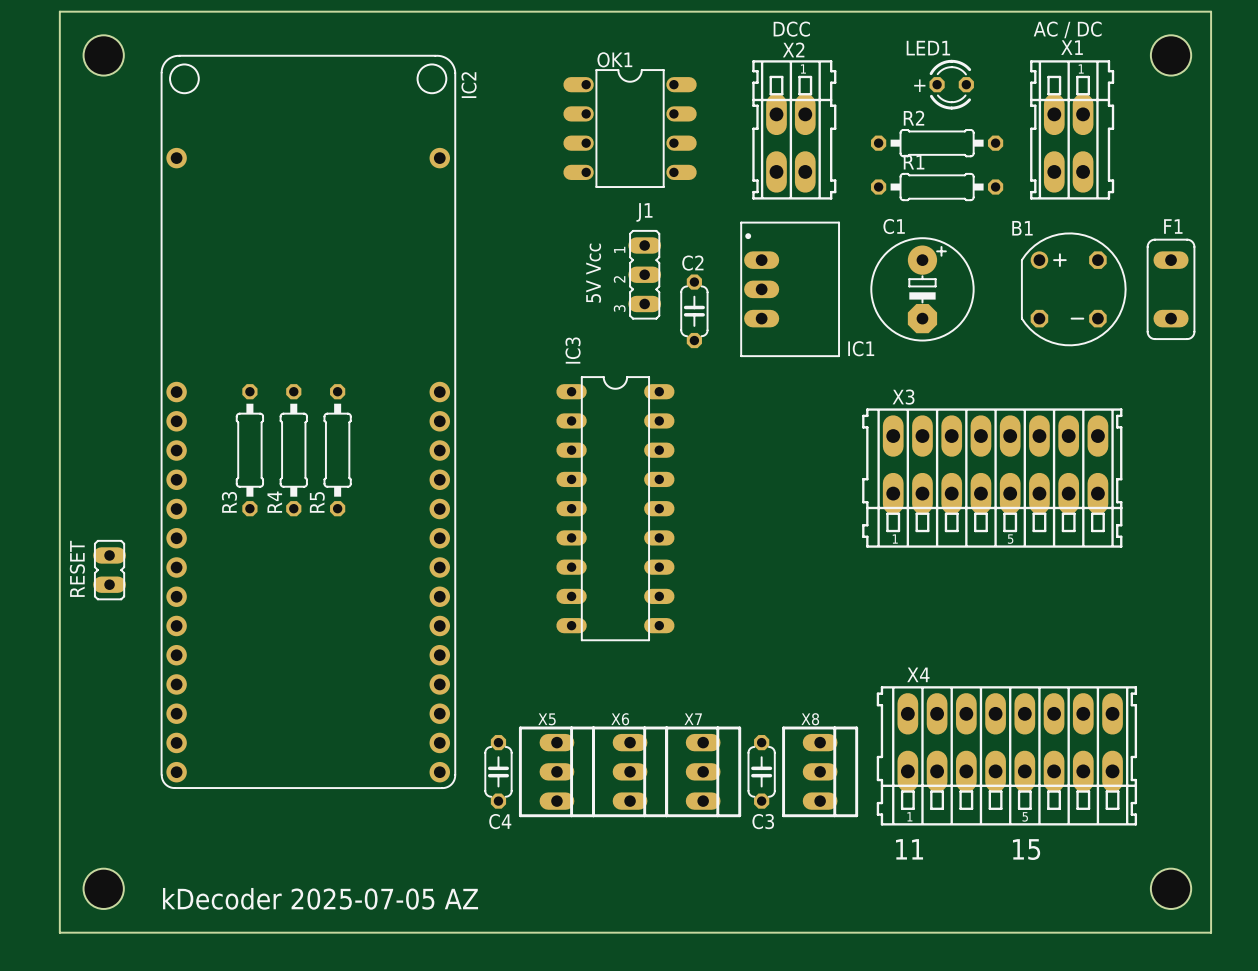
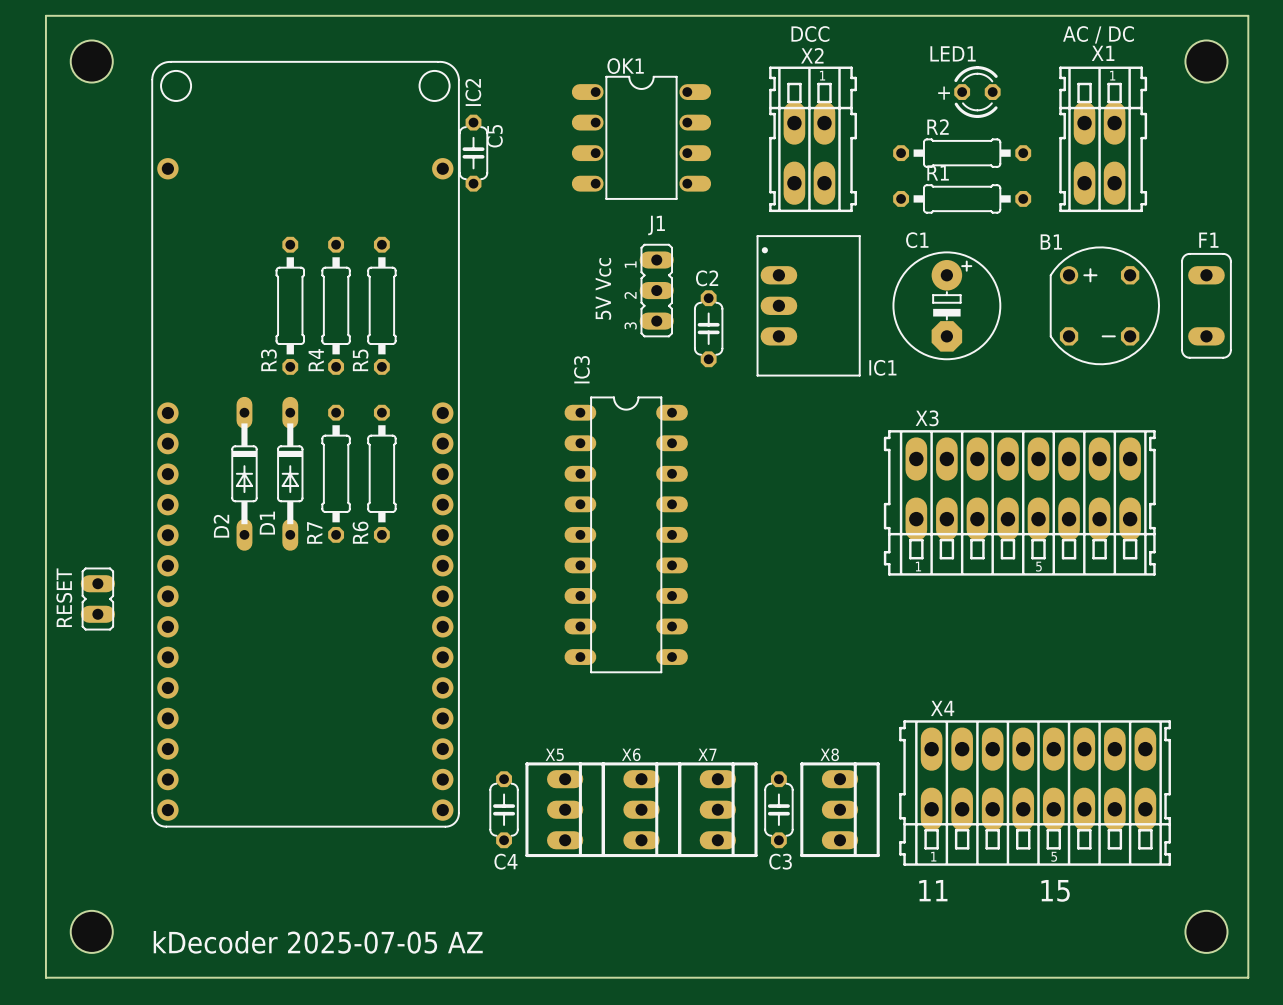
C5: none -> (473, 153)
R5: none -> (381, 305)
R3 position: (249, 450) -> (290, 305)
D2: none -> (244, 473)
R4 position: (293, 450) -> (336, 305)
D1: none -> (290, 473)
R6: none -> (381, 473)
R5 name: R5 (317, 502) -> R7 (314, 532)

